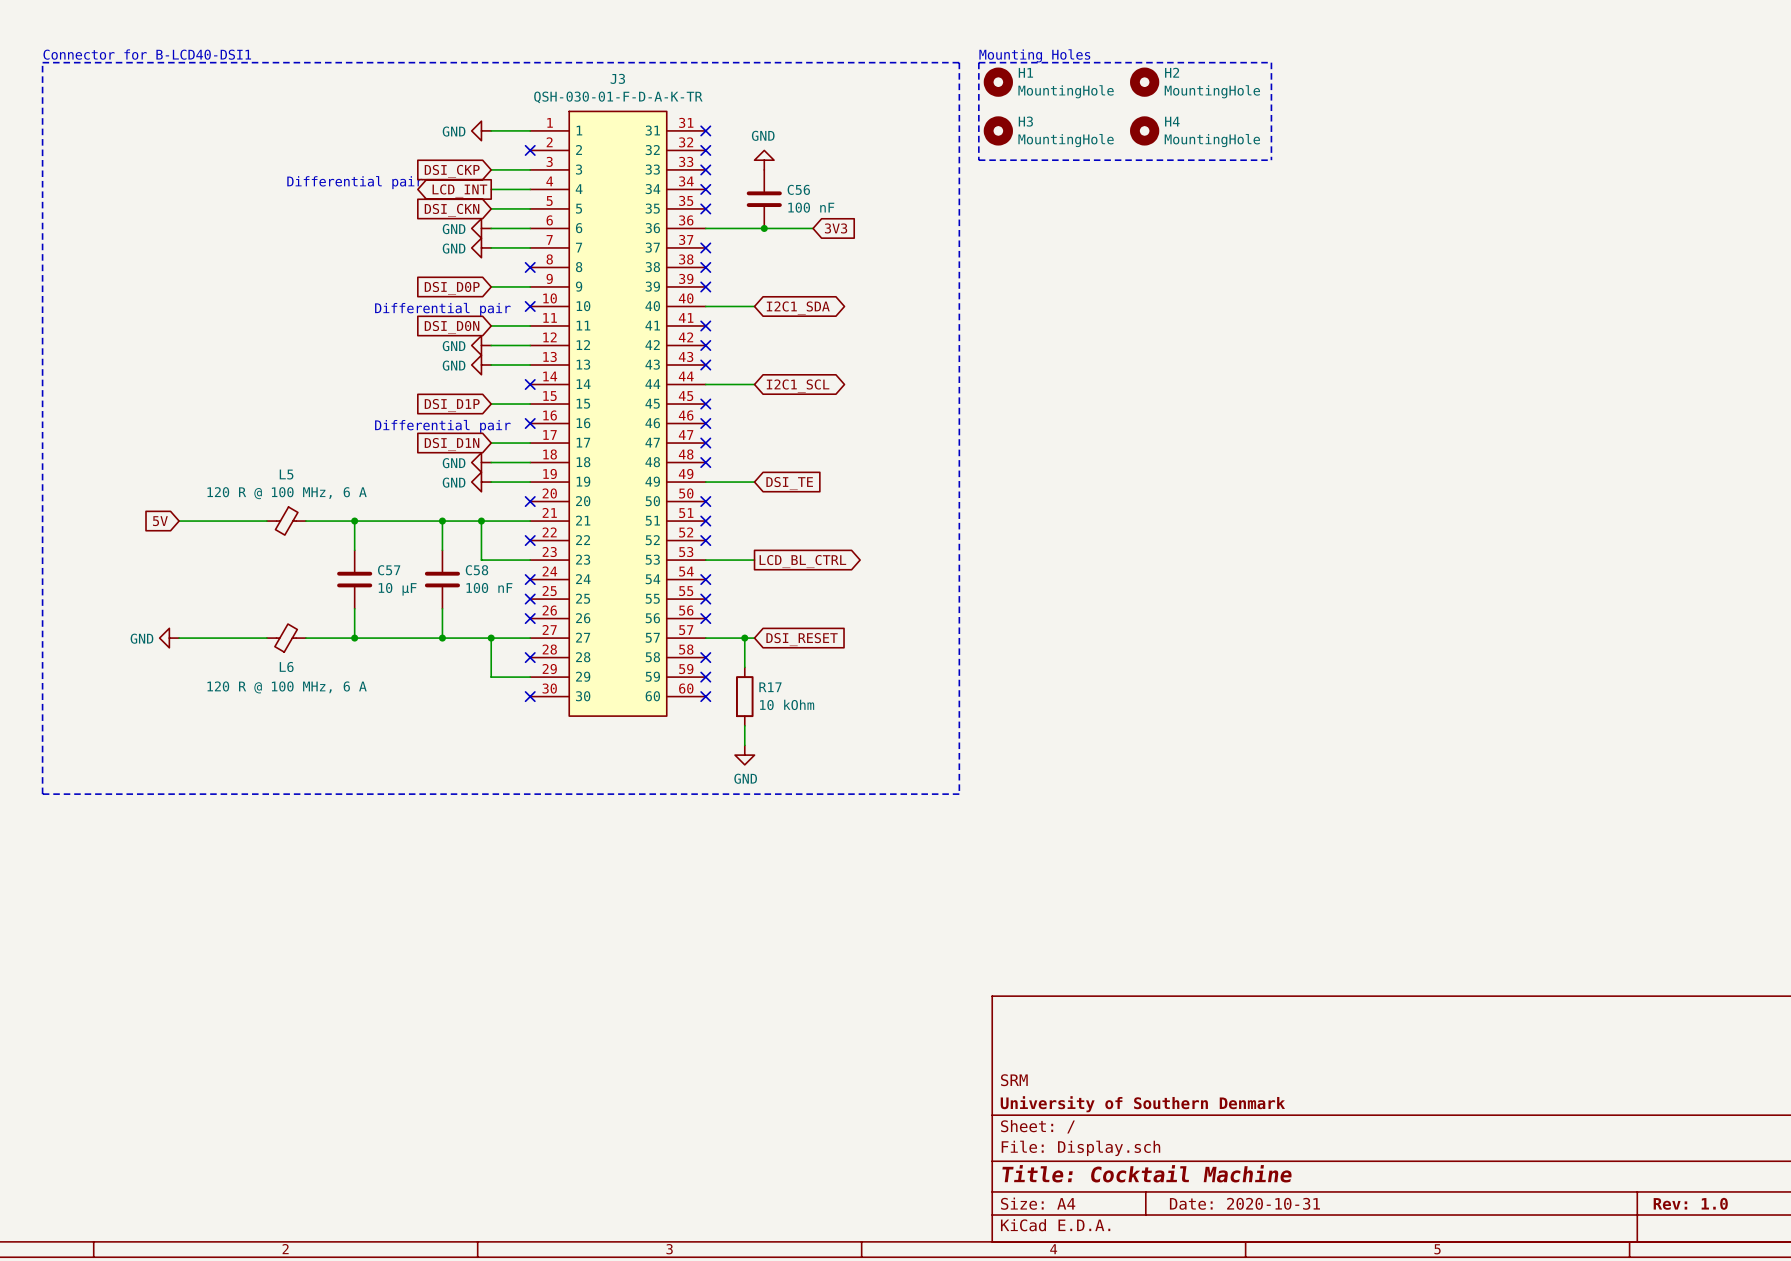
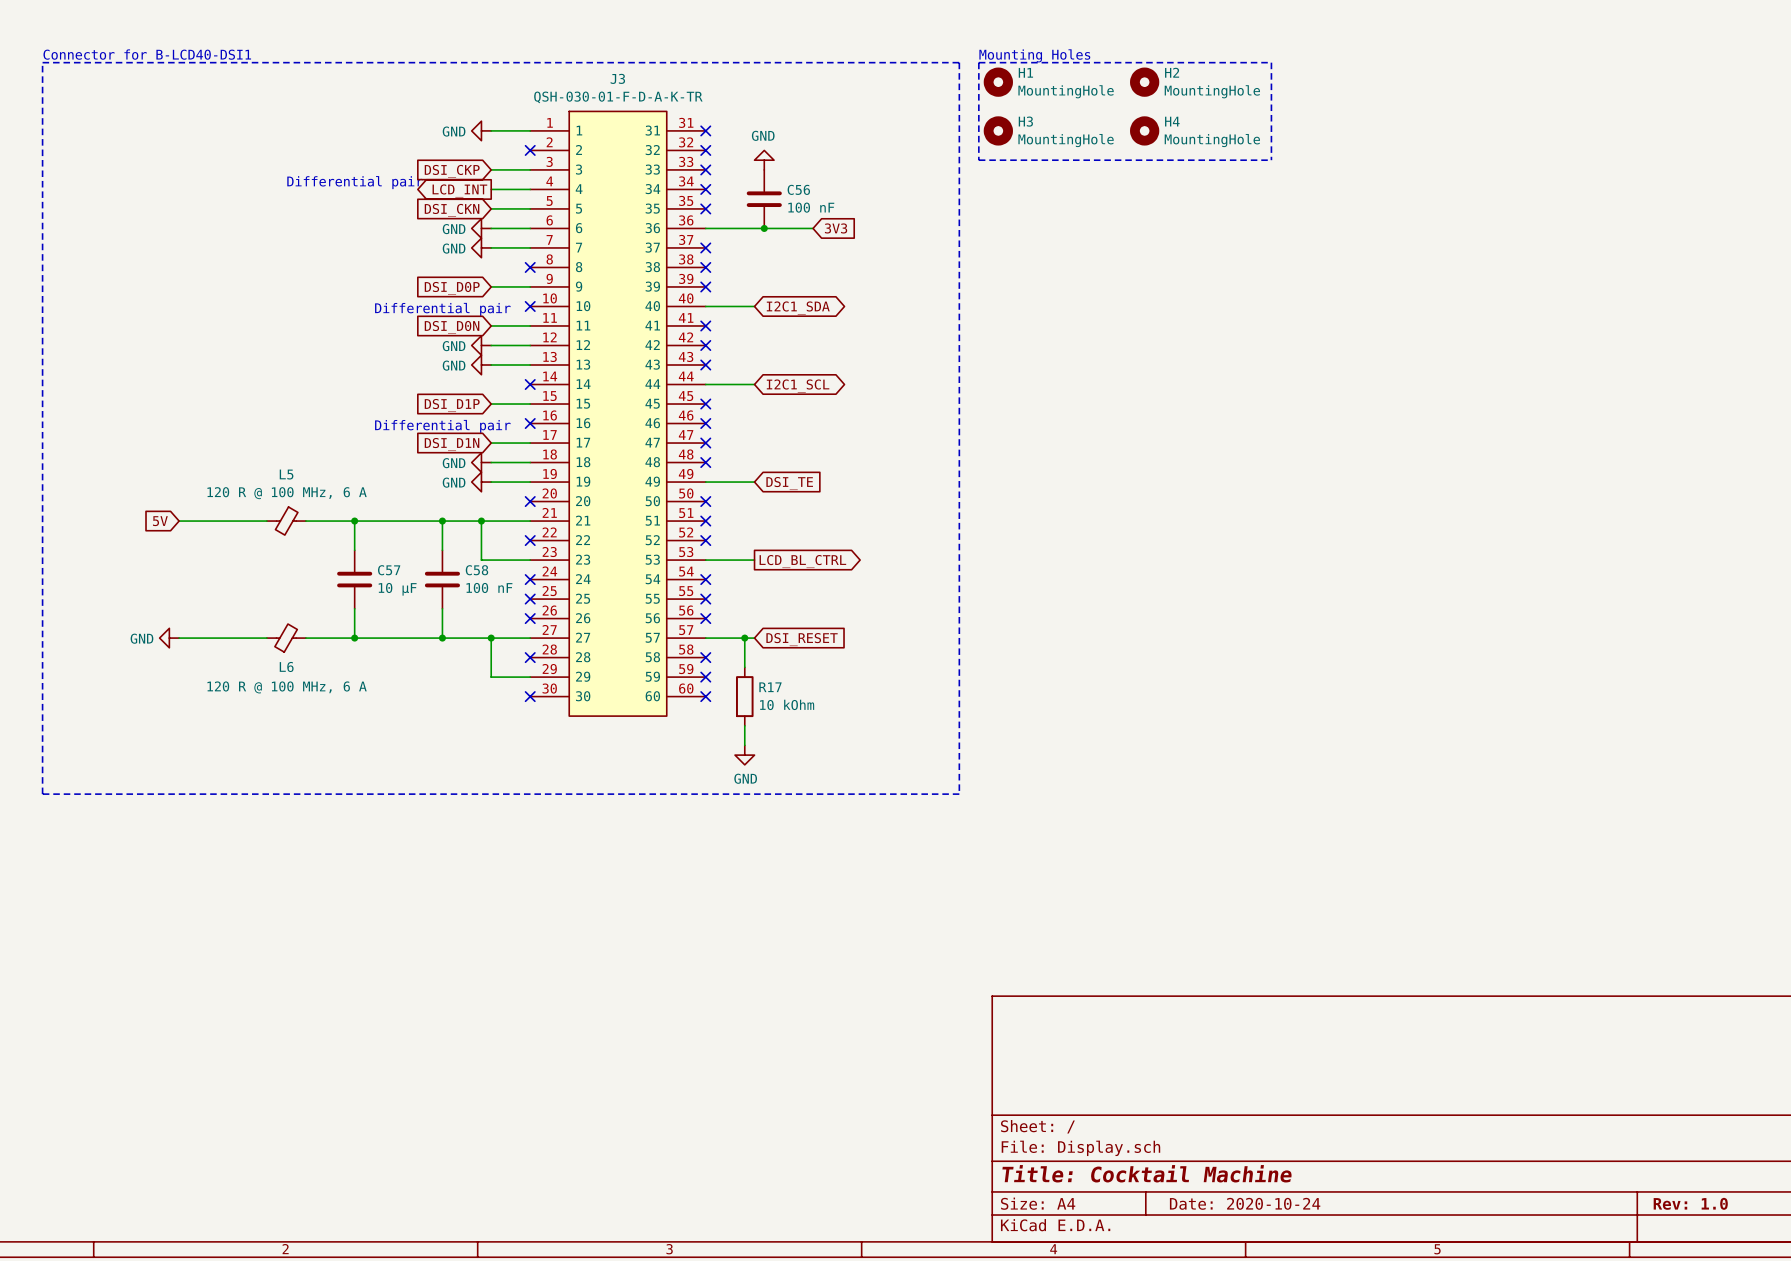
title block: SRM (1014, 1080) -> none
title block: University of Southern Denmark (1142, 1104) -> none
title block: Date: 2020-10-31 (1244, 1203) -> Date: 2020-10-24 (1245, 1203)

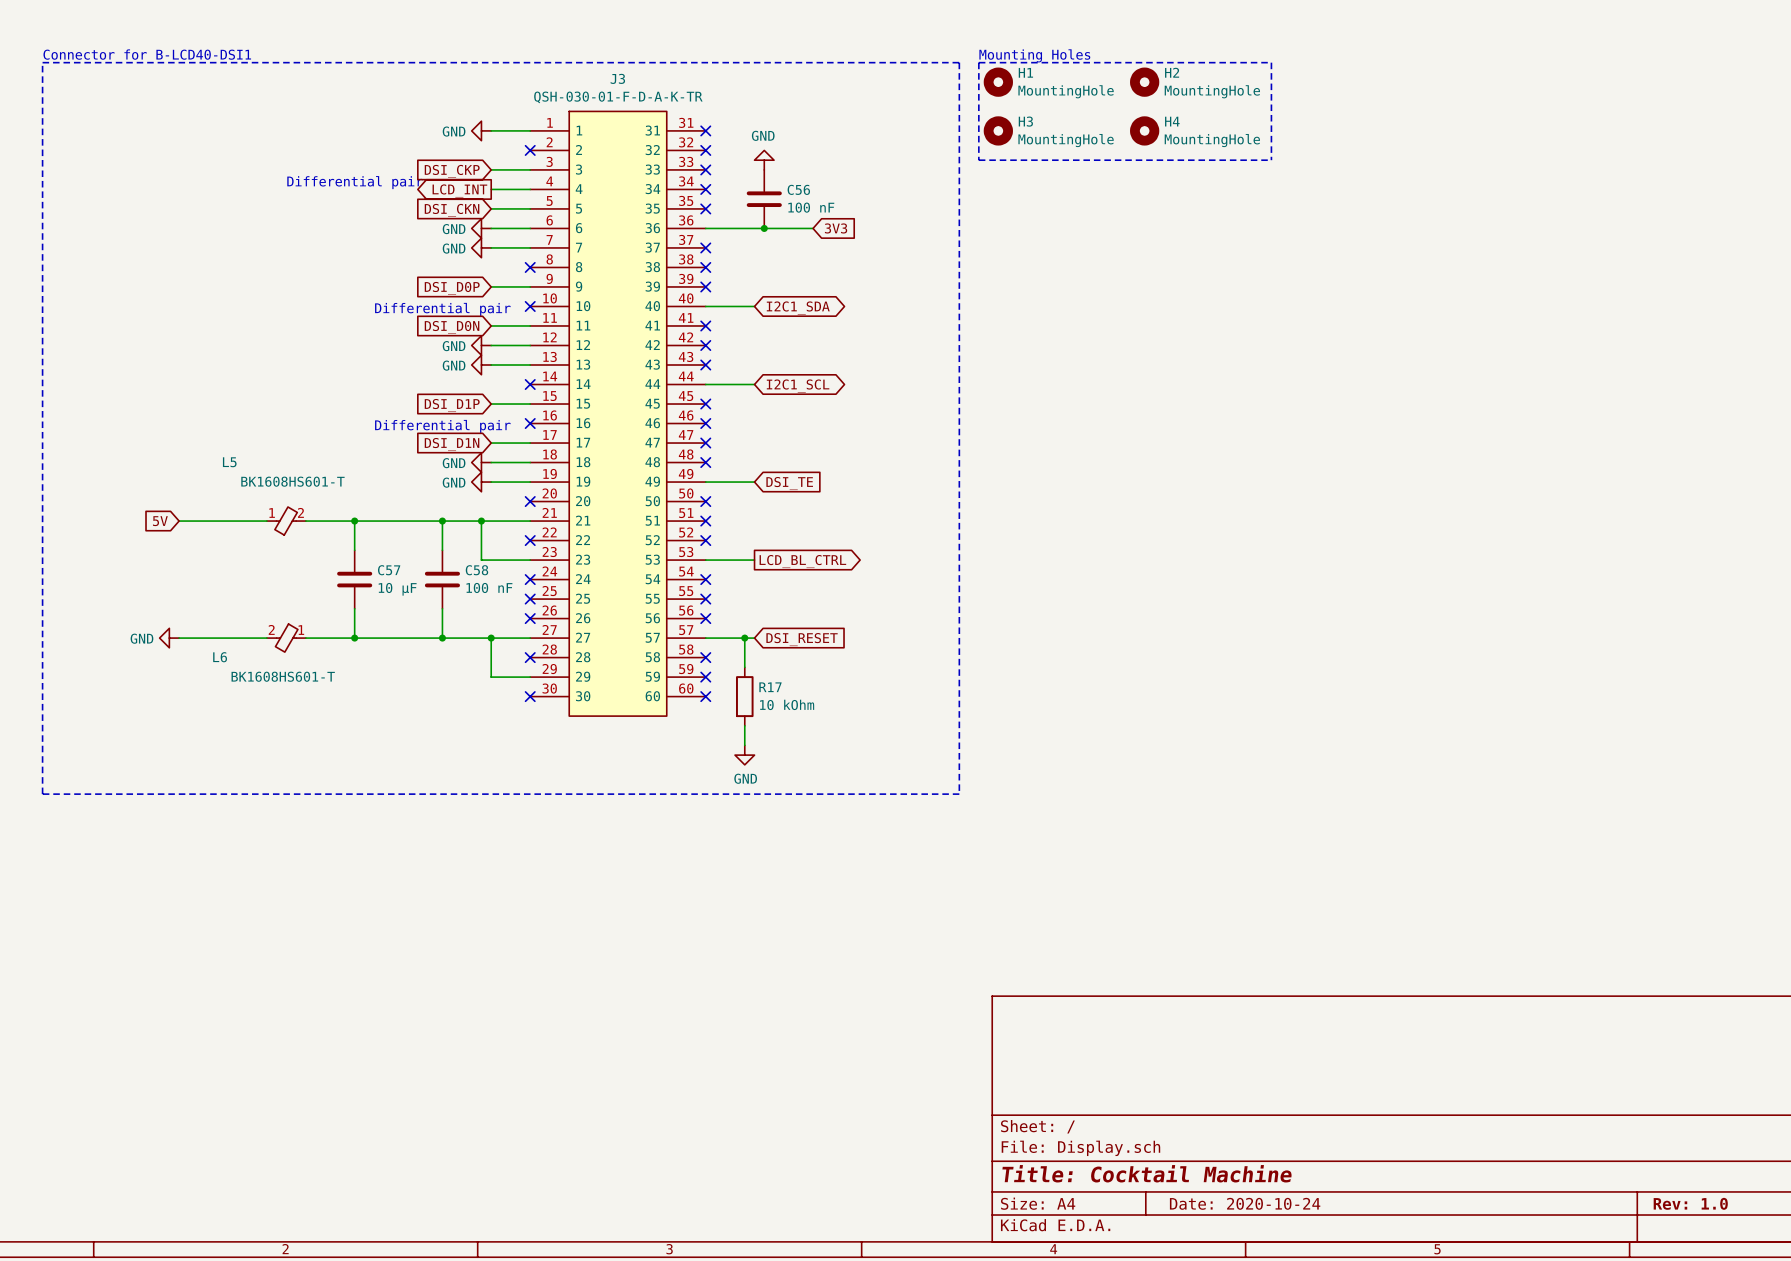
L5 name position: L5 (286, 474) -> L5 (229, 462)
L5 value: 120 R @ 100 MHz, 6 A (287, 493) -> BK1608HS601-T (292, 481)
L5 symbol: [266, 507, 306, 536] -> [266, 507, 306, 536]
L6 symbol: [266, 624, 306, 653] -> [266, 624, 306, 653]
L6 name position: L6 (286, 666) -> L6 (220, 657)
L6 value: 120 R @ 100 MHz, 6 A (287, 687) -> BK1608HS601-T (283, 676)

